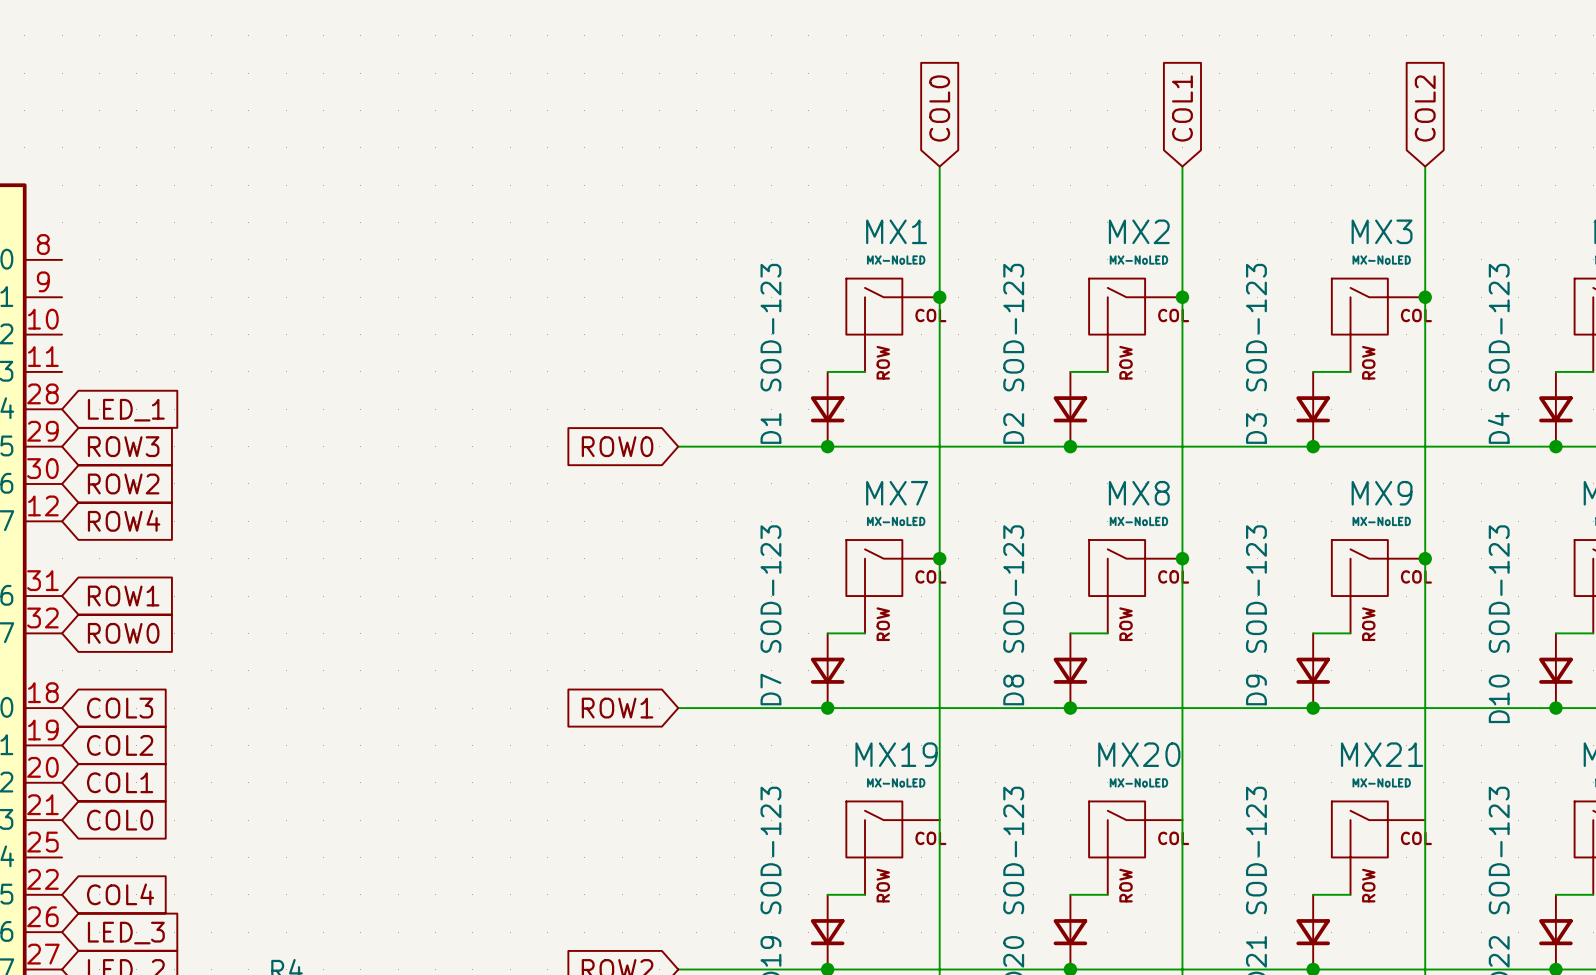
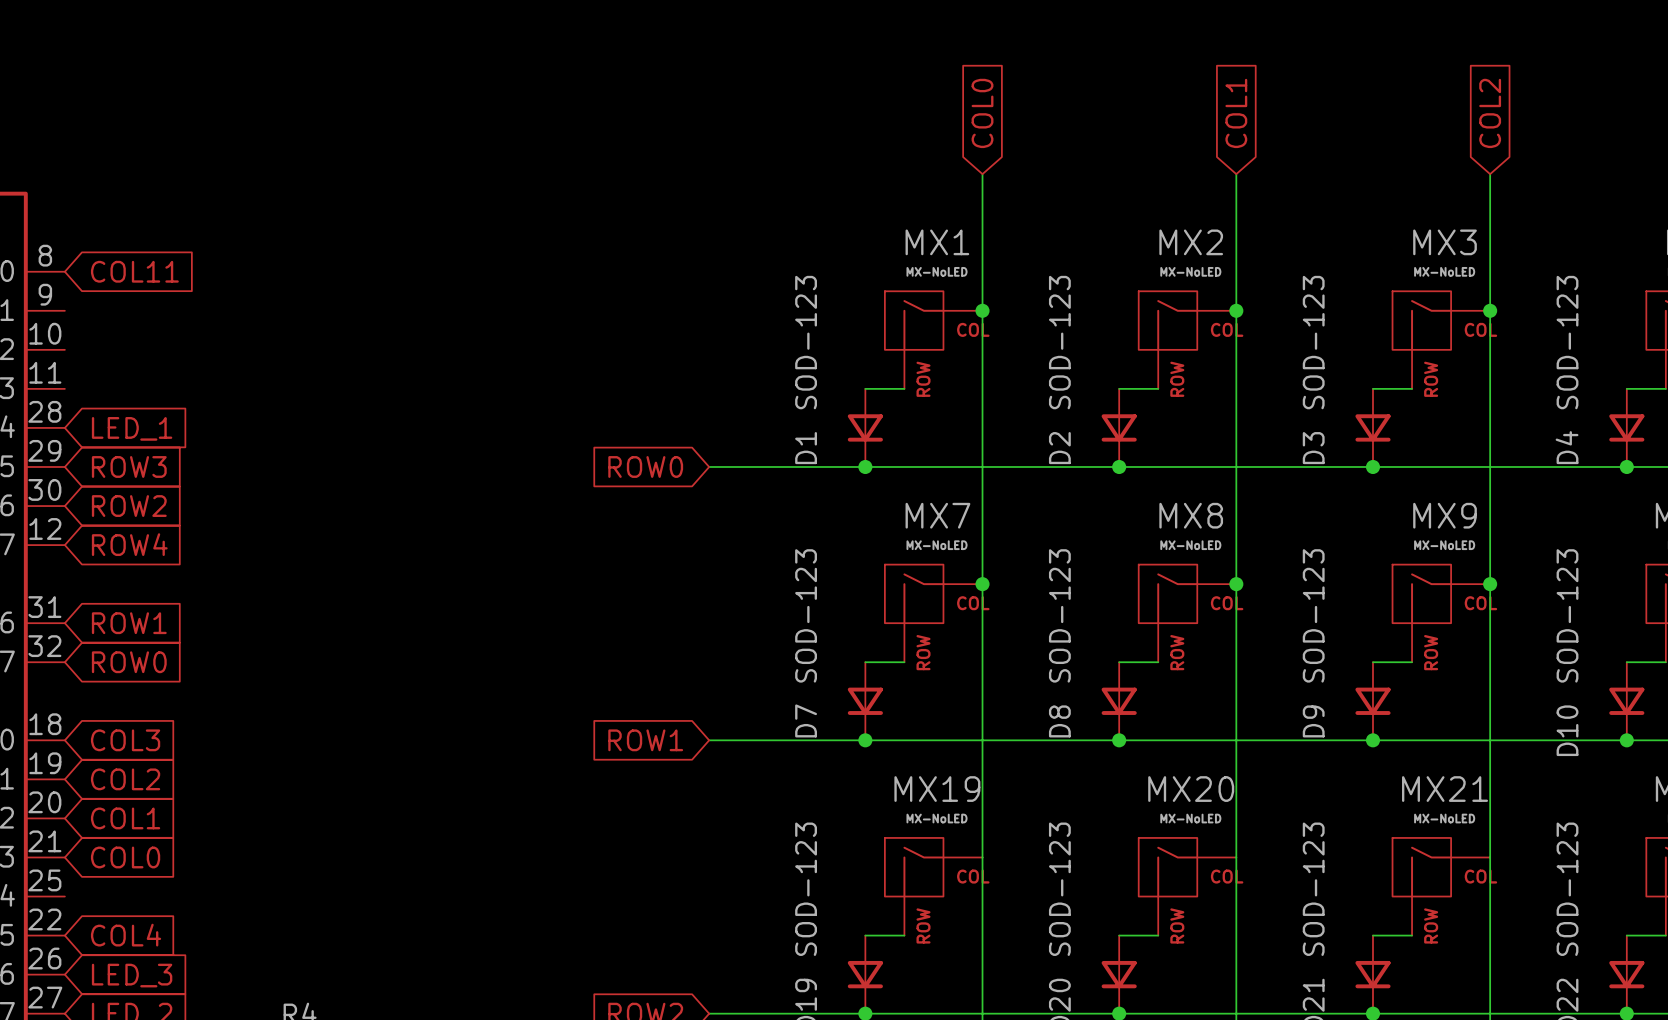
global label: none -> COL11 (134, 271)

